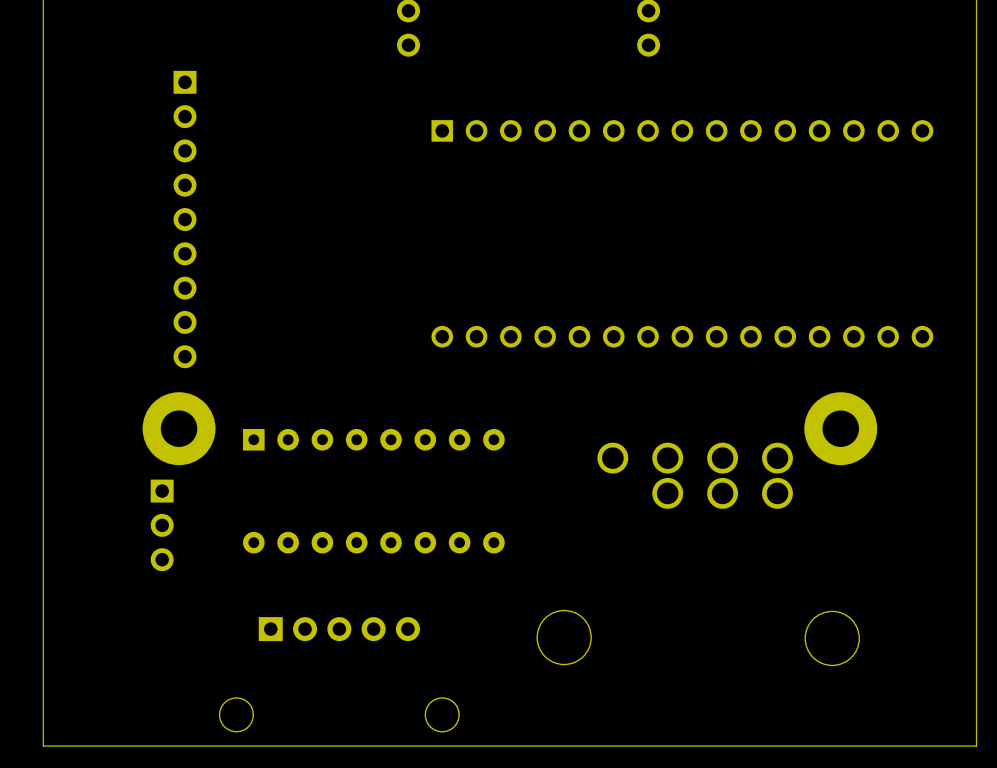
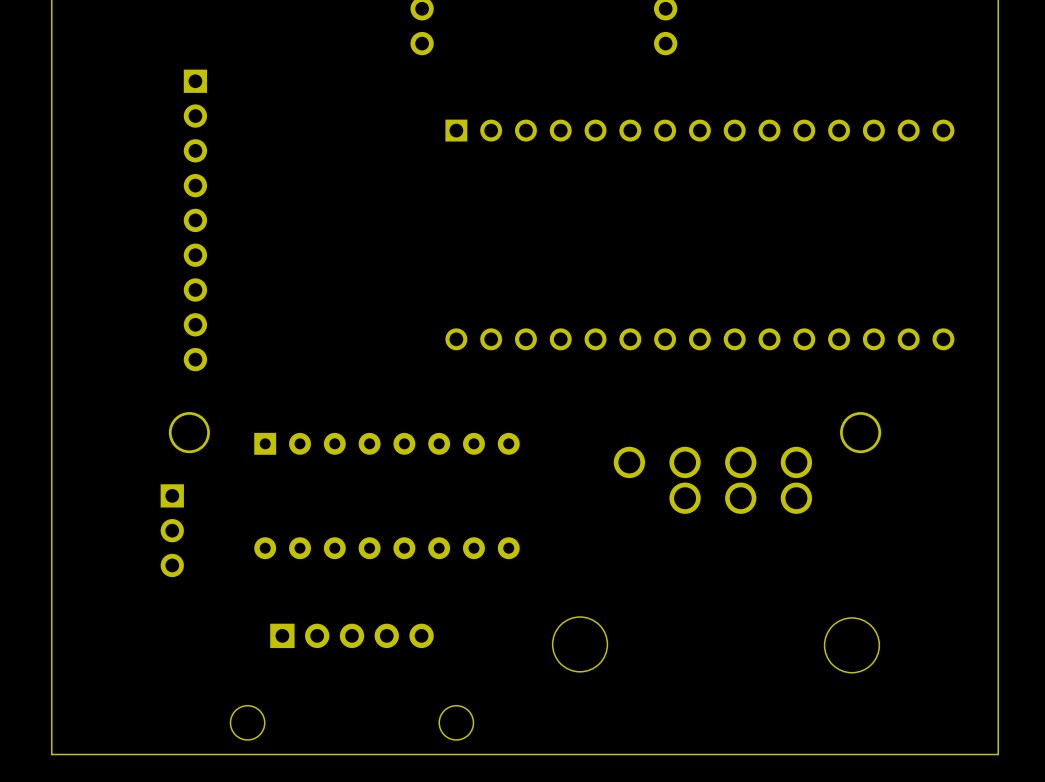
round board edge: none -> [168, 412, 210, 454]
round board edge: none -> [840, 412, 882, 454]
part: (179, 428) -> none
part: (840, 428) -> none

